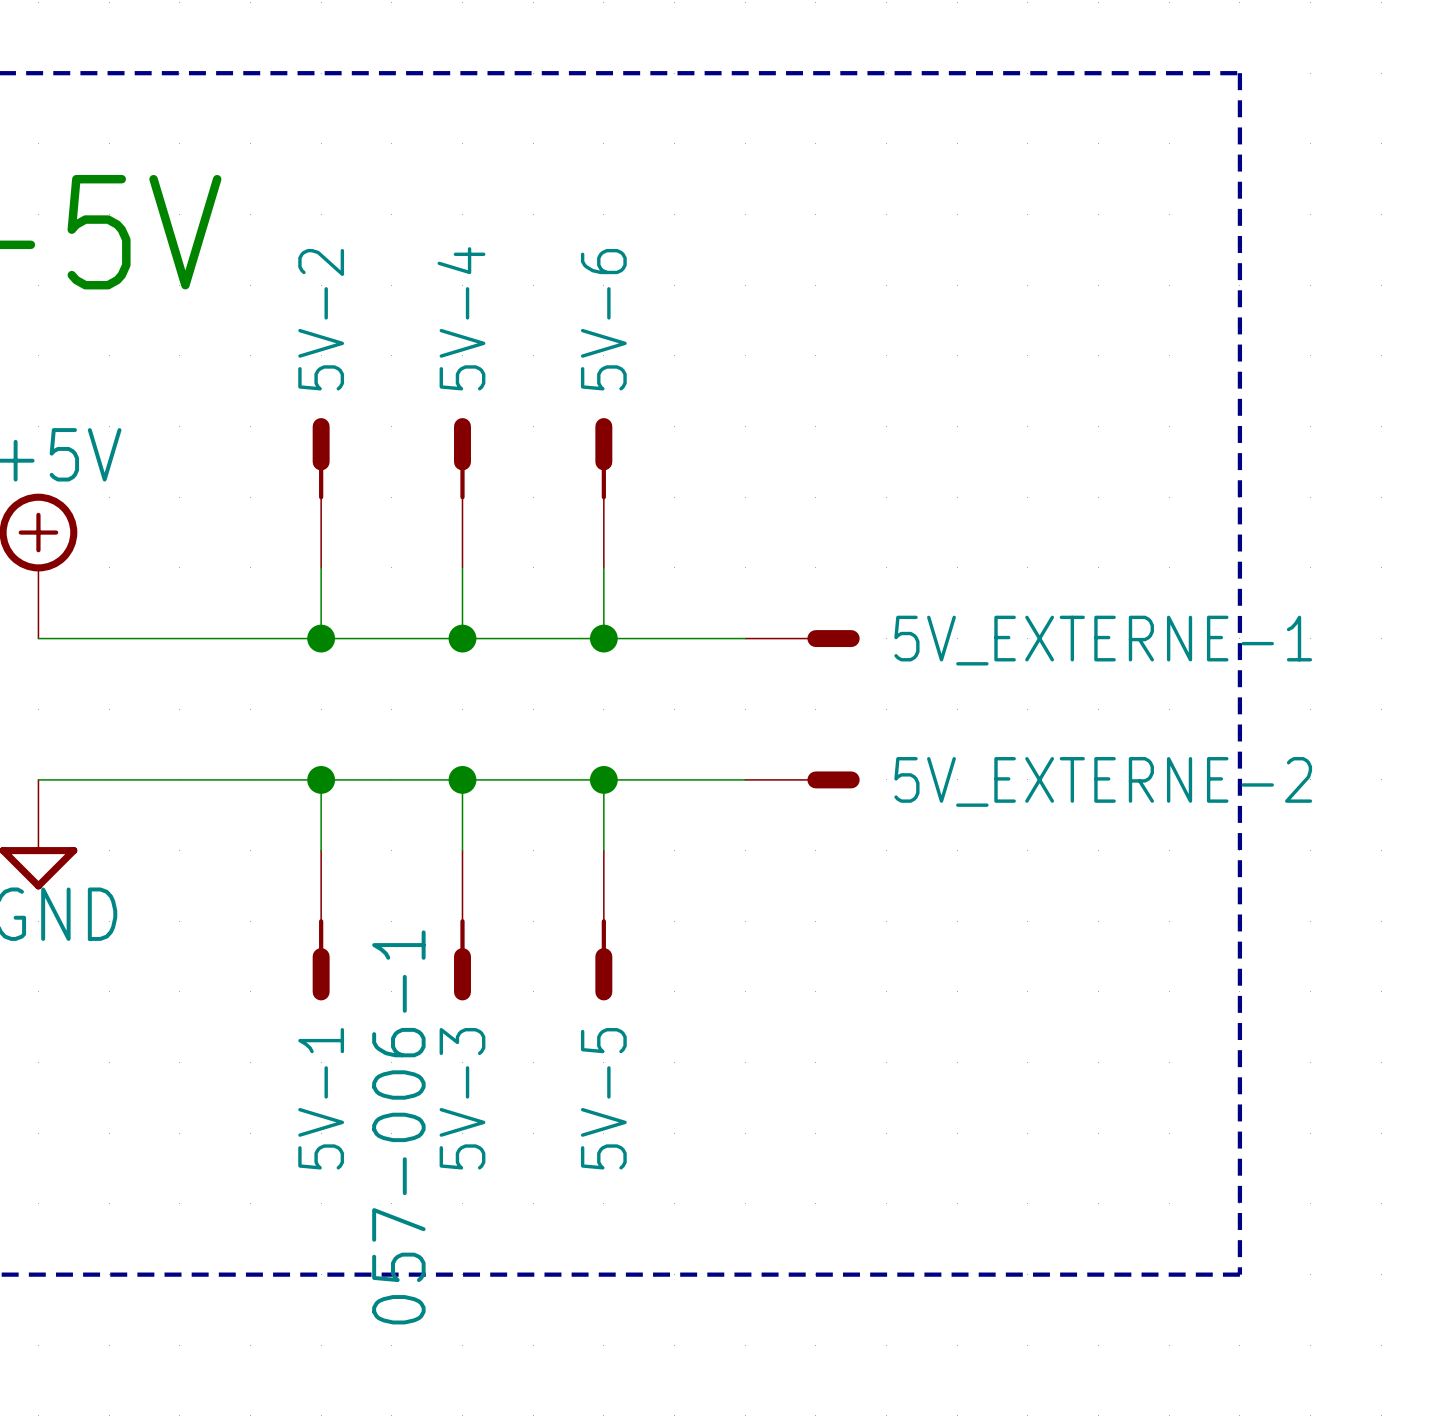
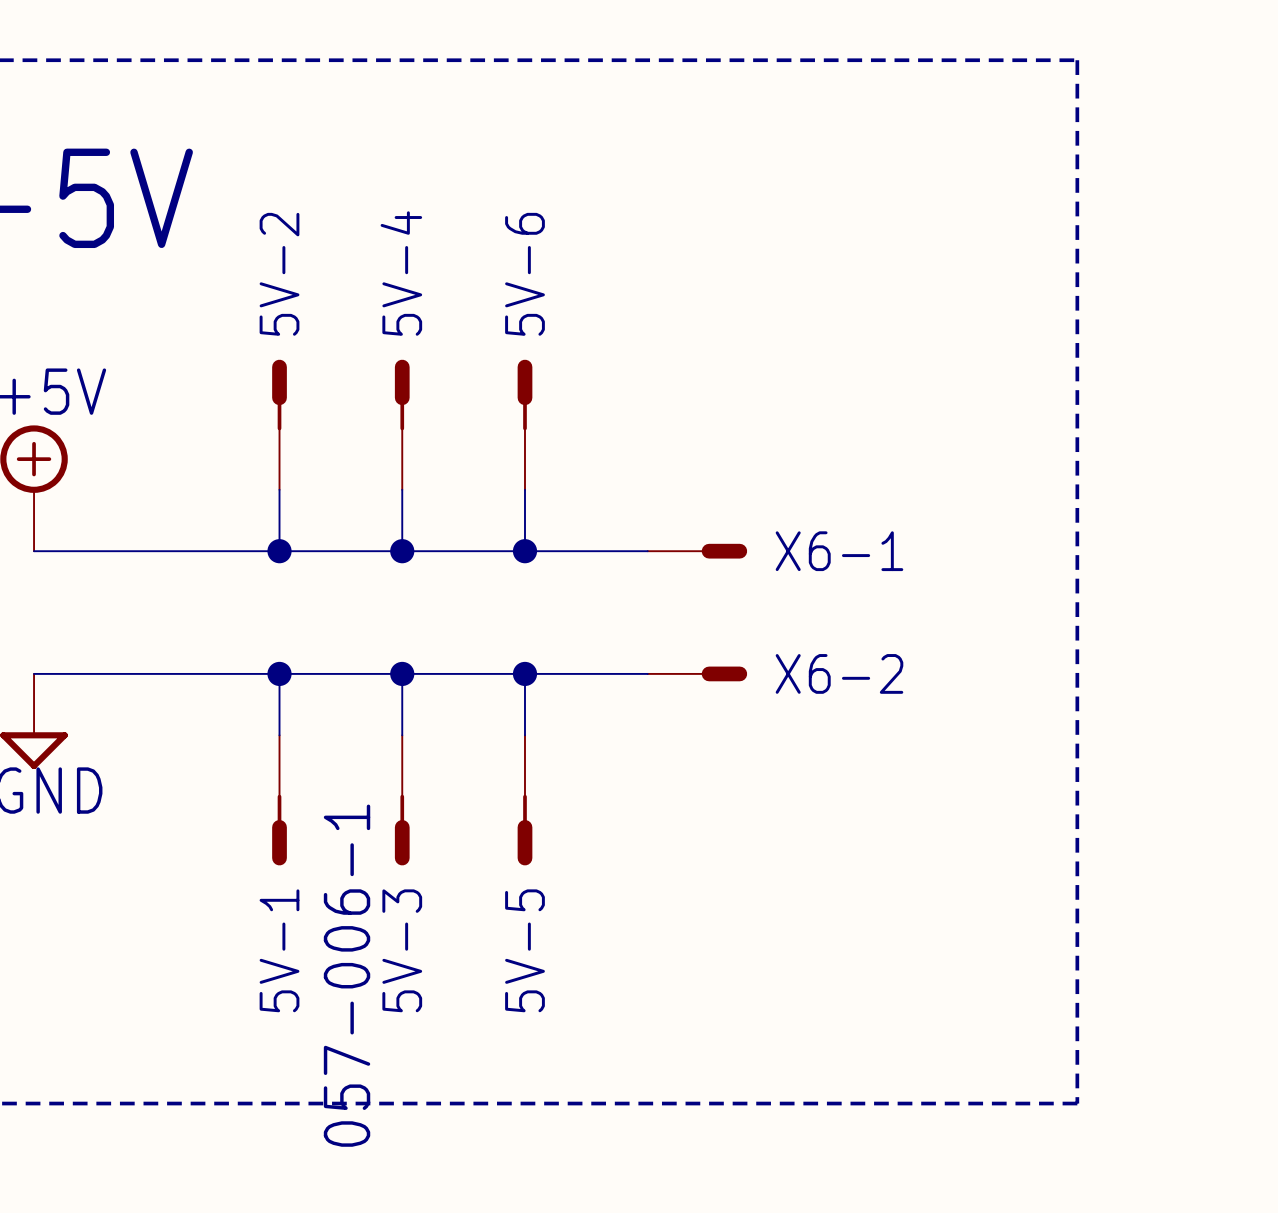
5V_EXTERNE-1 name: 5V_EXTERNE-1 (1103, 640) -> X6-1 (839, 551)
5V_EXTERNE-2 name: 5V_EXTERNE-2 (1103, 781) -> X6-2 (839, 673)

